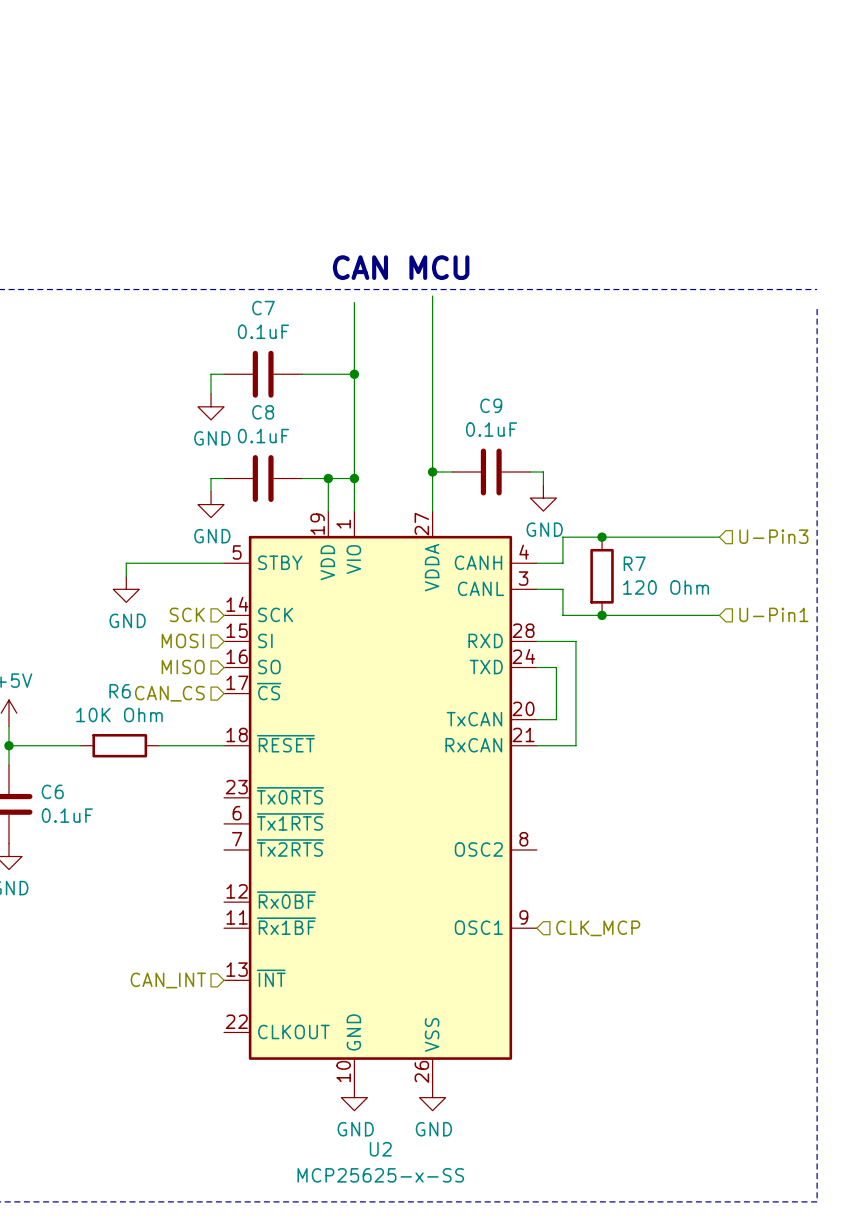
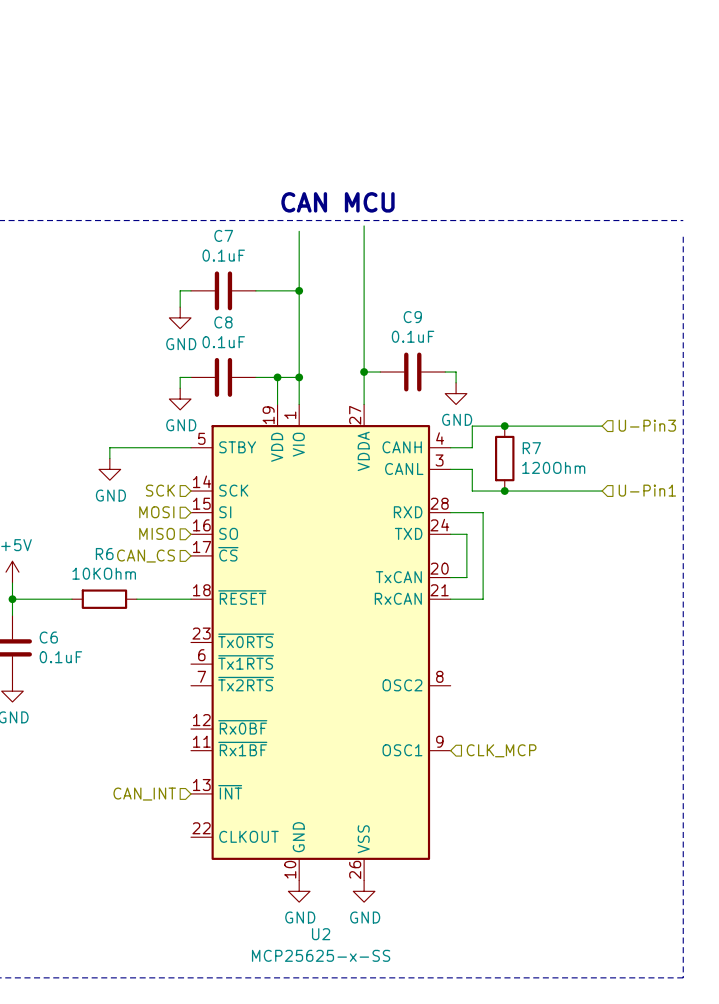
R7 value: 120 Ohm (666, 587) -> 120Ohm (553, 467)
R6 value: 10K Ohm (119, 714) -> 10KOhm (104, 573)

